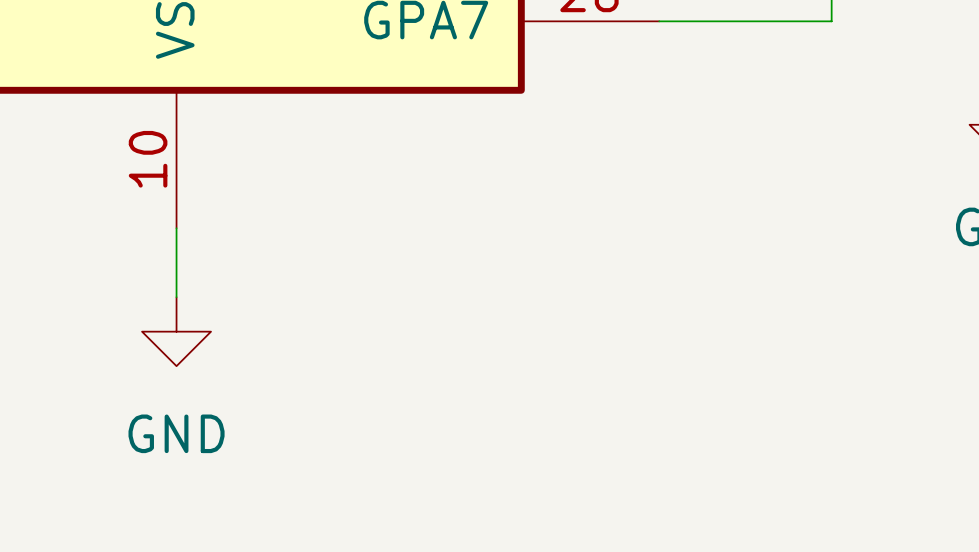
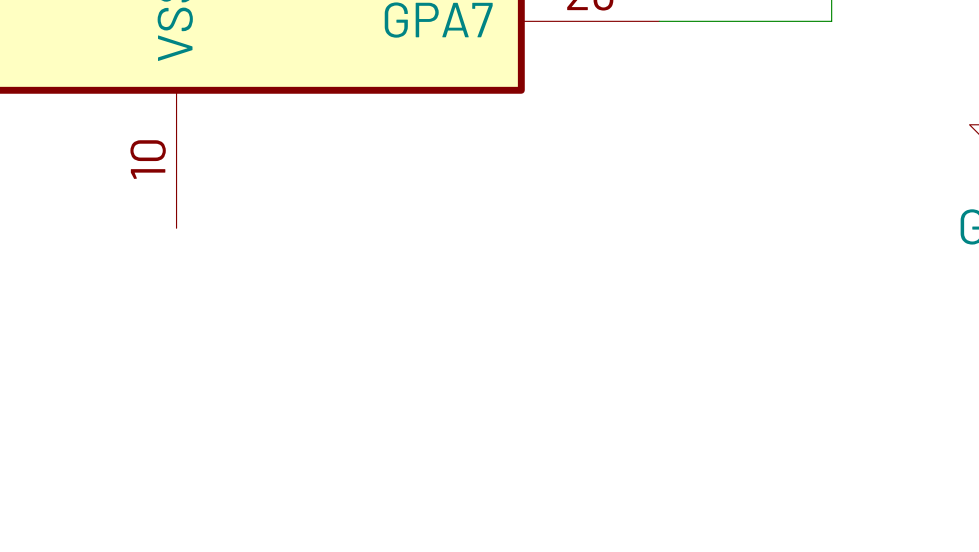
wire: (176, 228) (176, 297) -> none
power symbol: GND (176, 331) -> none

